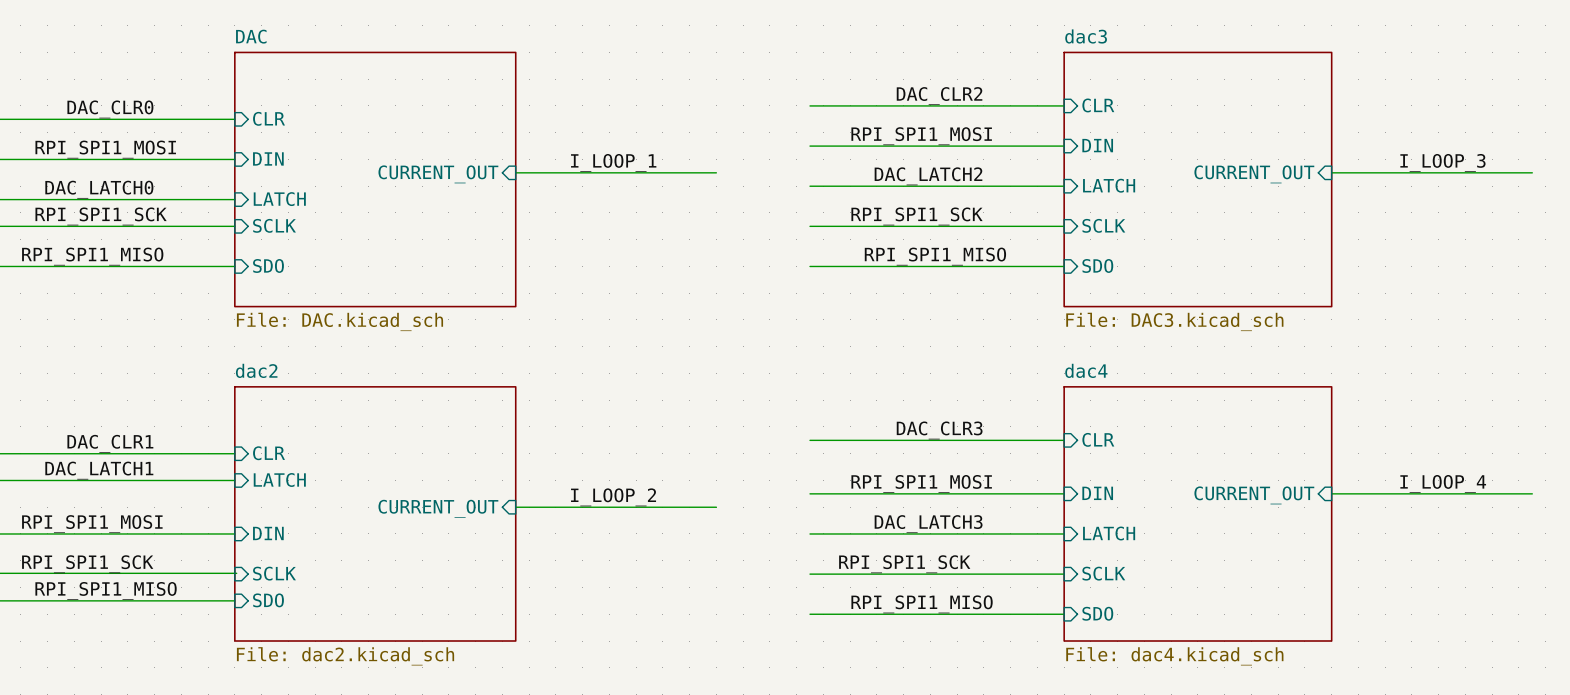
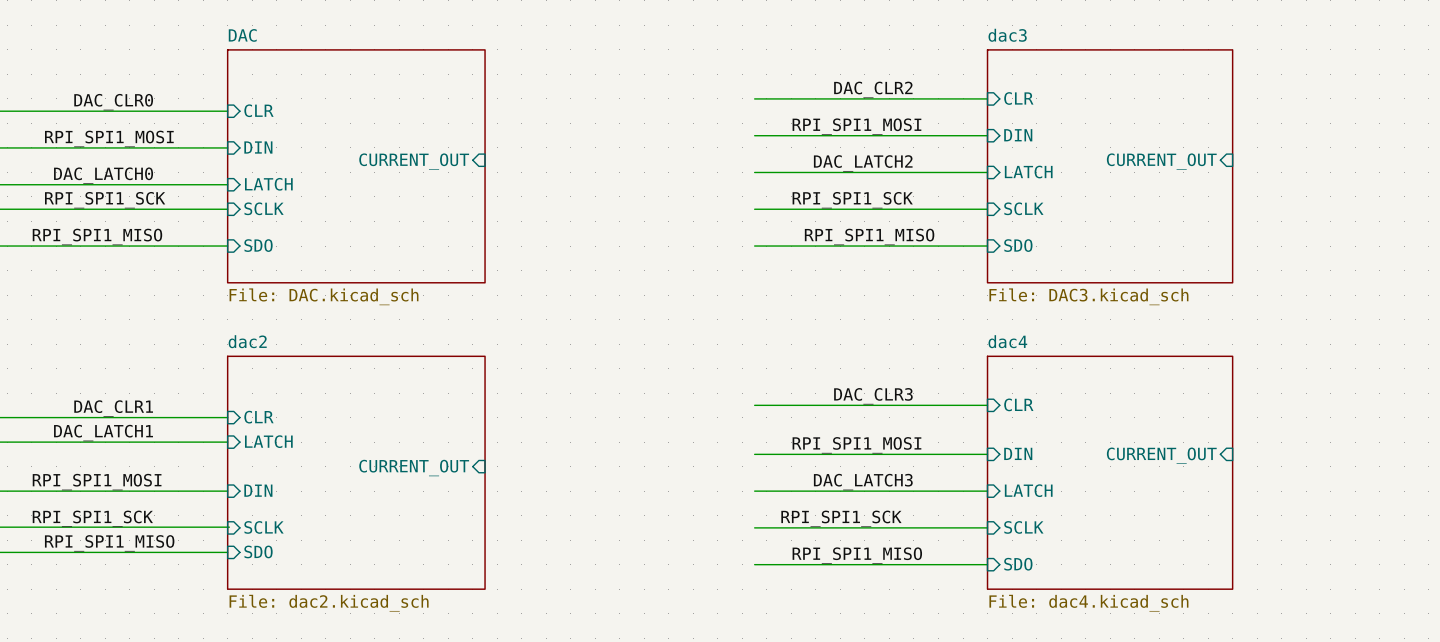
label: I_LOOP_1 (613, 162) -> none
label: I_LOOP_3 (1442, 162) -> none
wire: (515, 172) (716, 172) -> none
wire: (1331, 172) (1532, 172) -> none
label: I_LOOP_4 (1443, 483) -> none
wire: (1331, 493) (1532, 493) -> none
label: I_LOOP_2 (613, 497) -> none
wire: (515, 507) (716, 507) -> none

